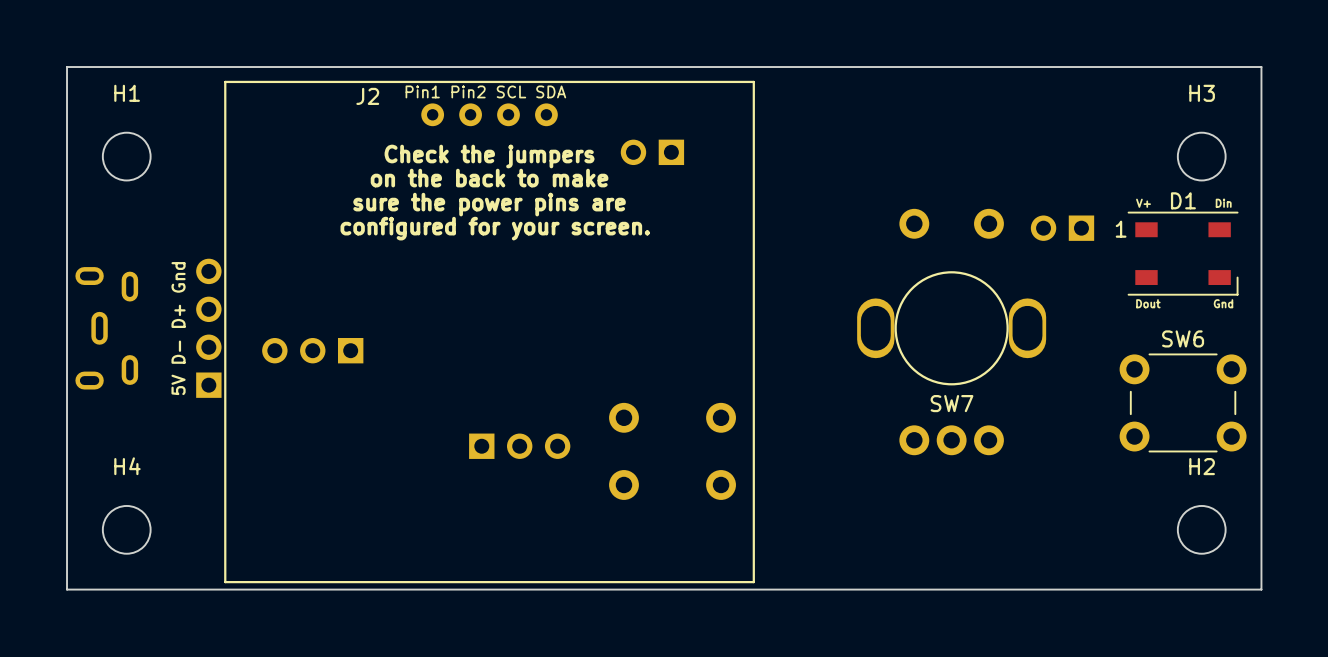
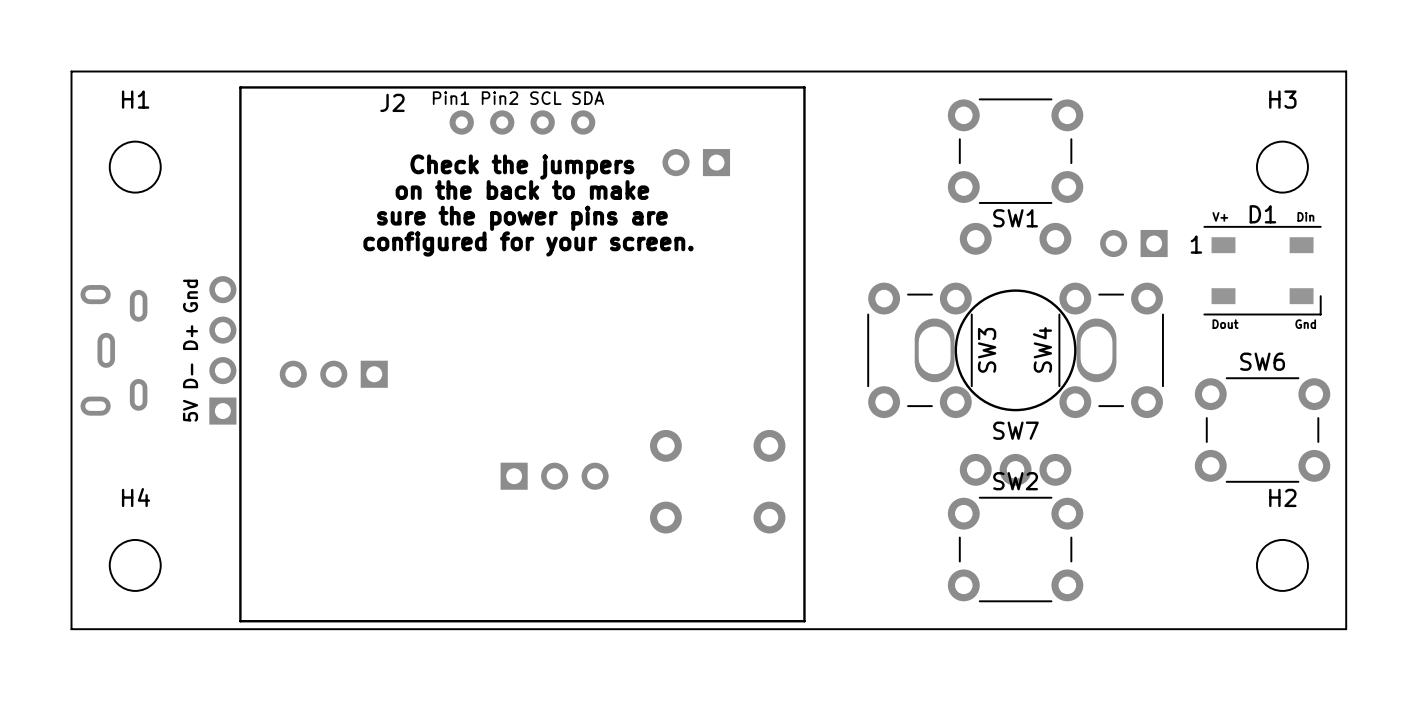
SW1: none -> (1015, 151)
SW3: none -> (919, 350)
SW4: none -> (1111, 350)
SW2: none -> (1015, 549)

